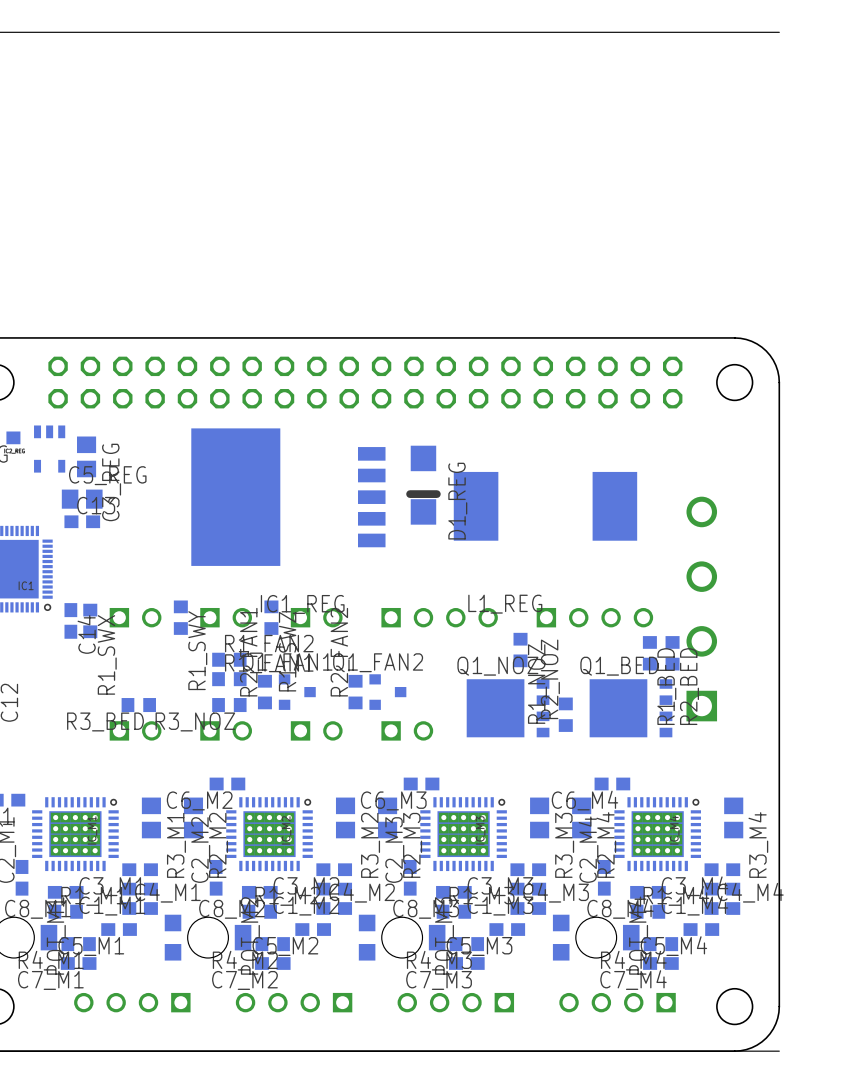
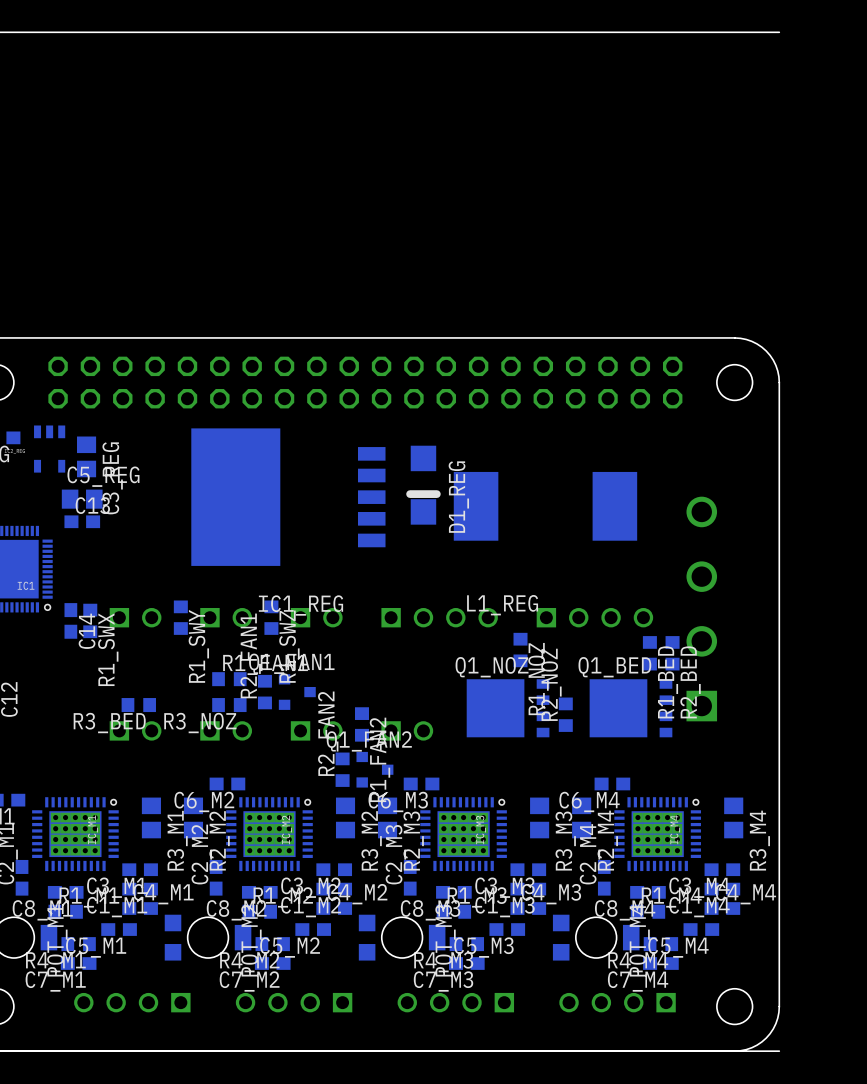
R1_FAN2 rotation: 0° (229, 659) -> 90° clockwise (362, 724)
R1_FAN2 position: (229, 659) -> (362, 724)
R2_FAN2 position: (355, 692) -> (342, 769)
Q1_FAN2 position: (387, 692) -> (374, 769)

